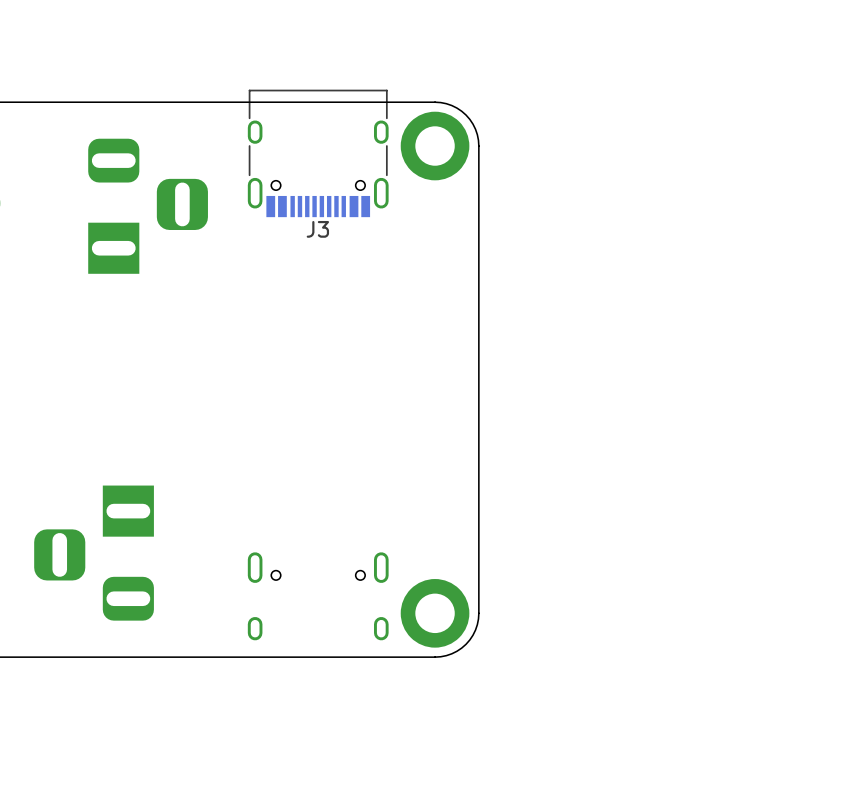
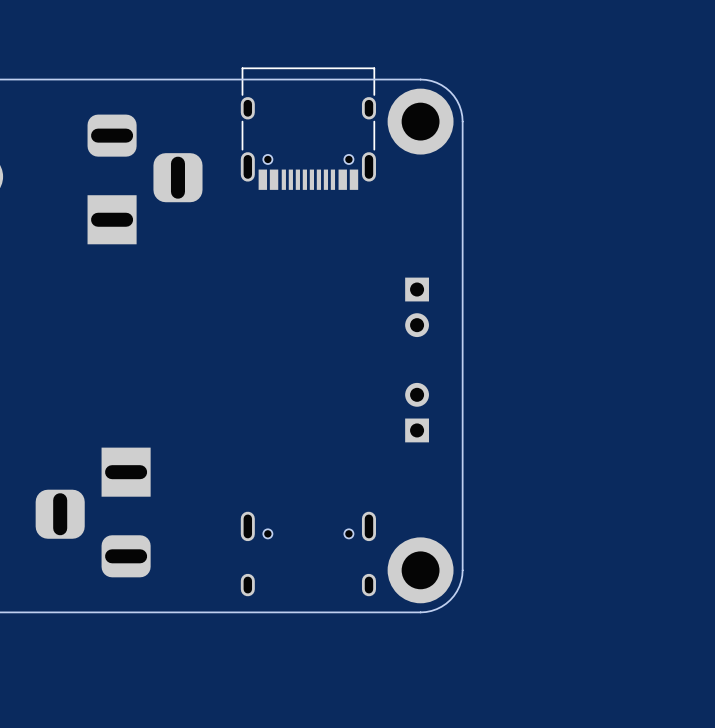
J3 name: J3 (317, 229) -> none
part: none -> (417, 307)
part: none -> (417, 412)

